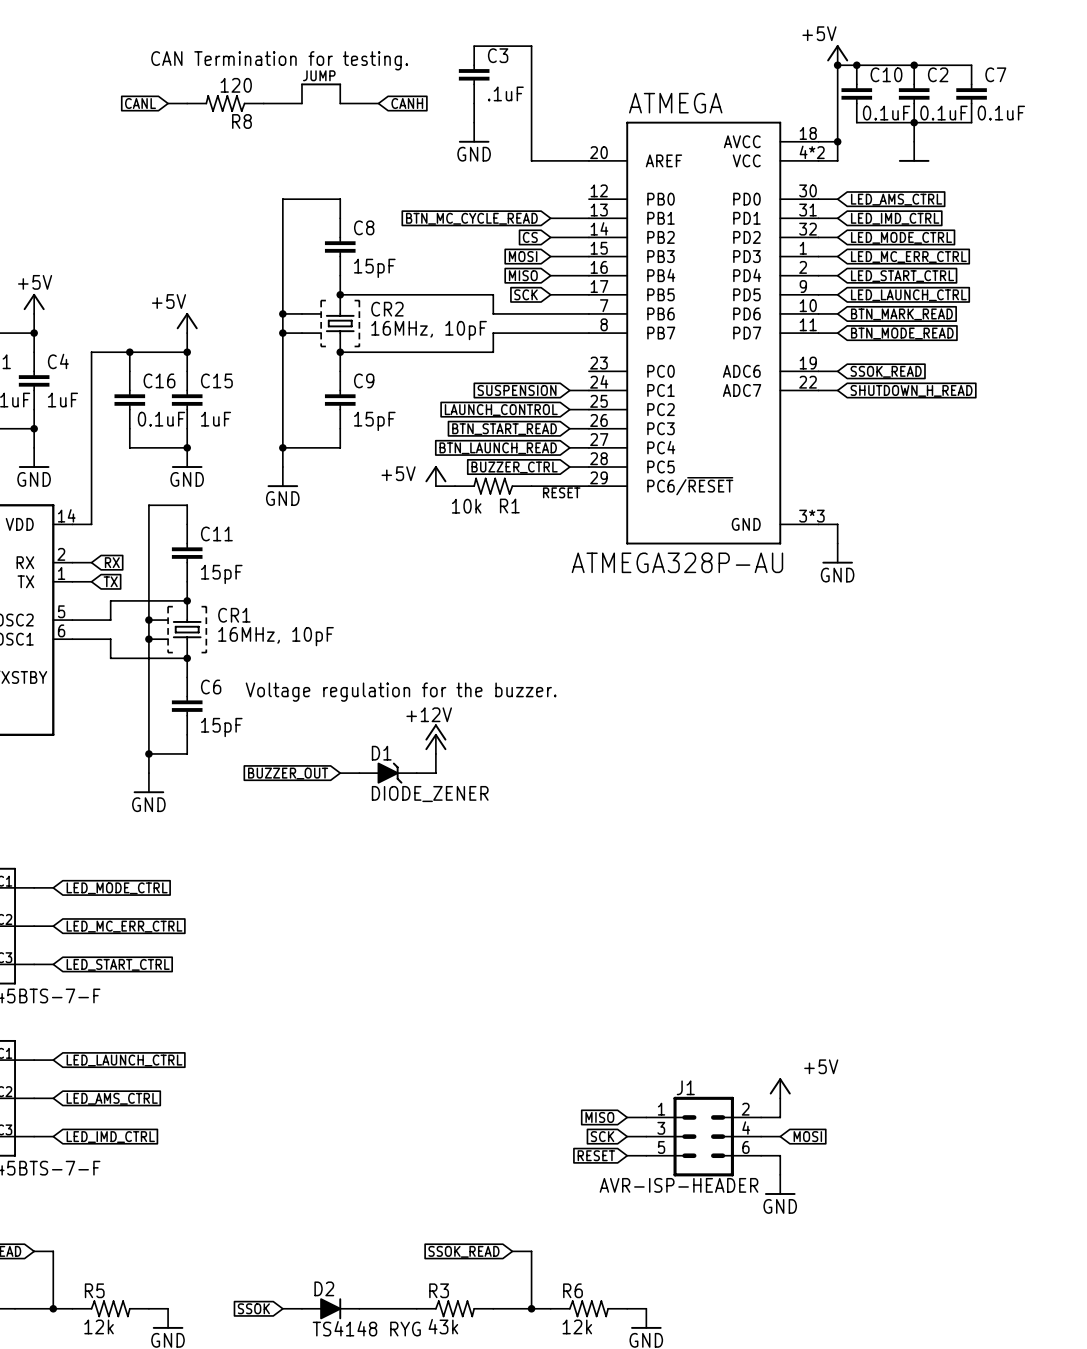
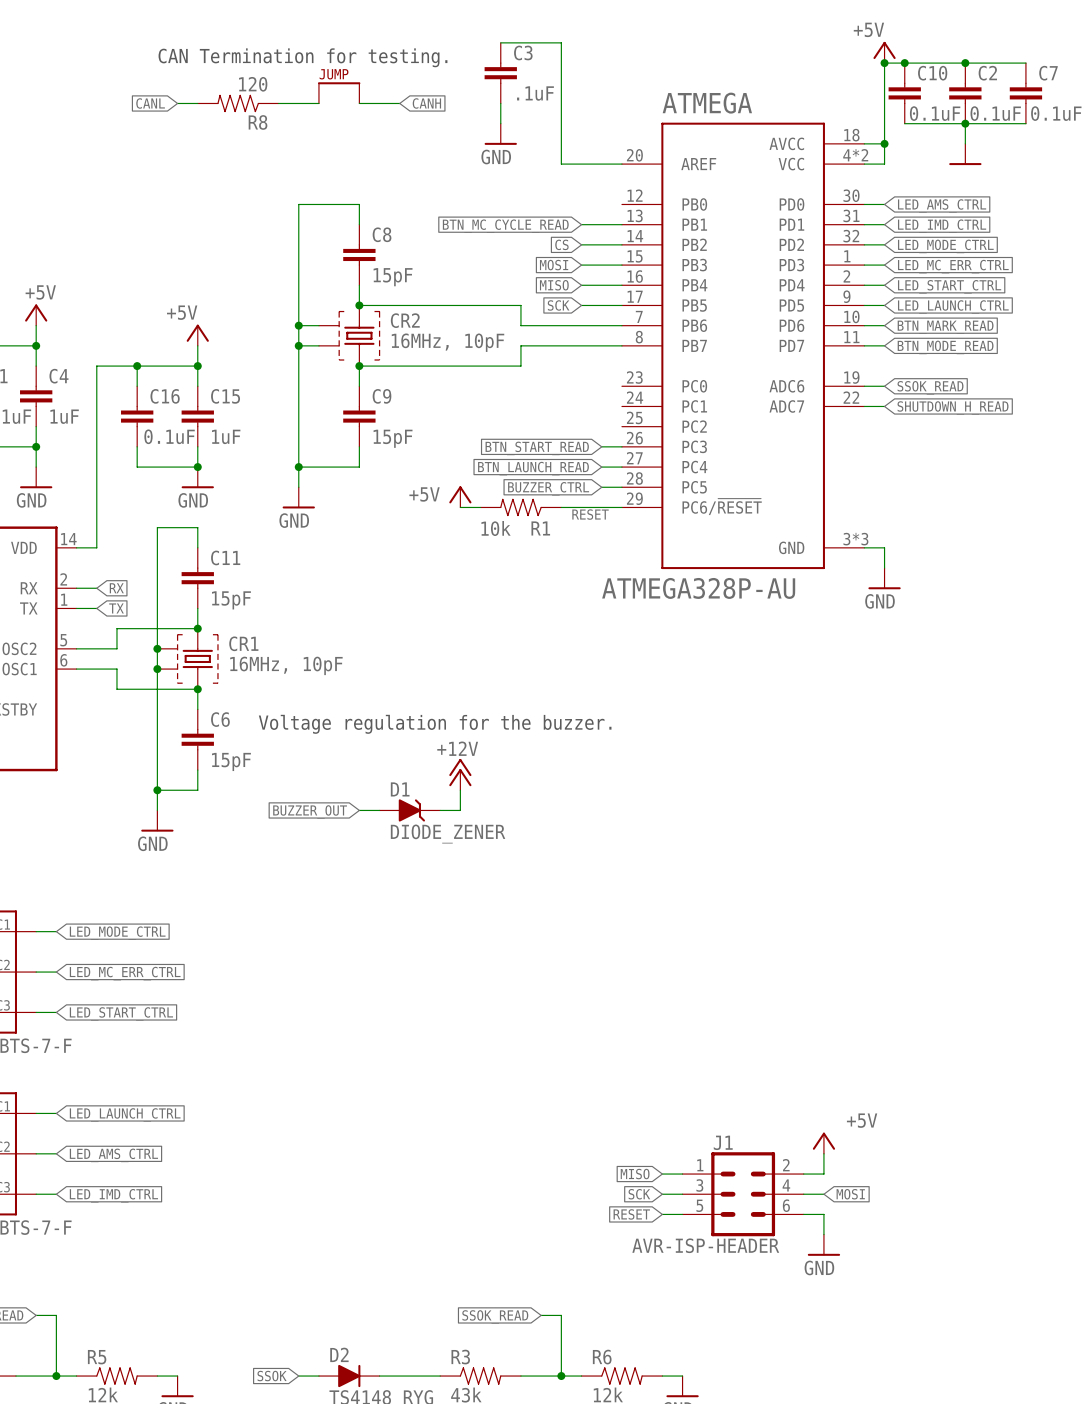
global label: SUSPENSION (517, 390) -> none
wire: (569, 390) (588, 390) -> none
wire: (569, 409) (588, 409) -> none
global label: LAUNCH_CONTROL (501, 410) -> none

